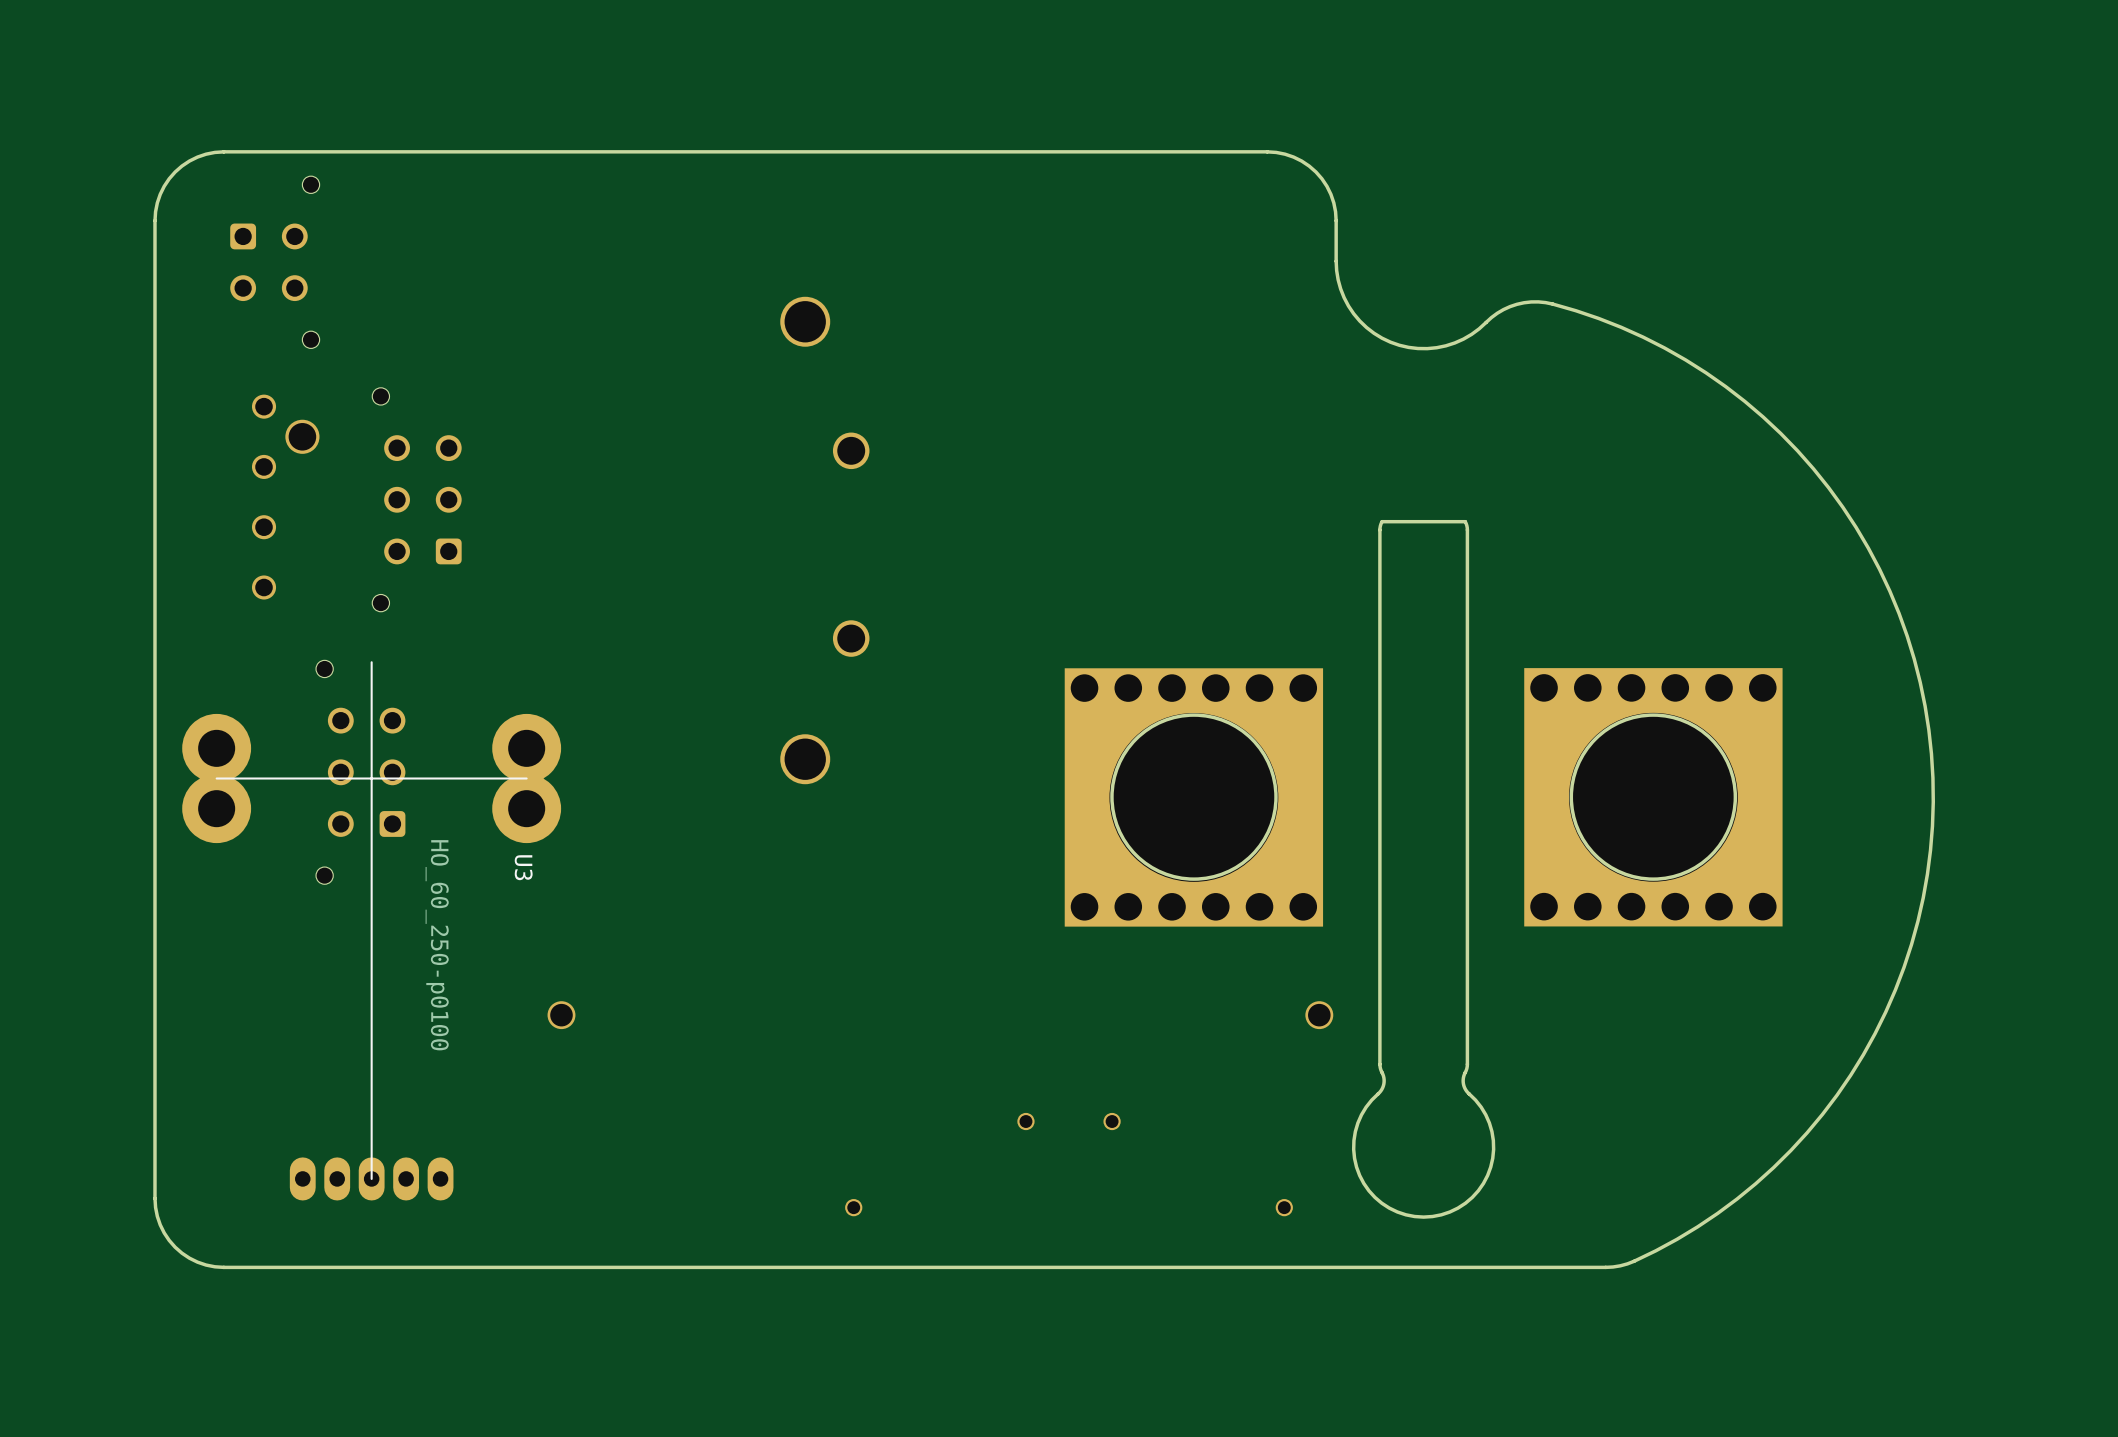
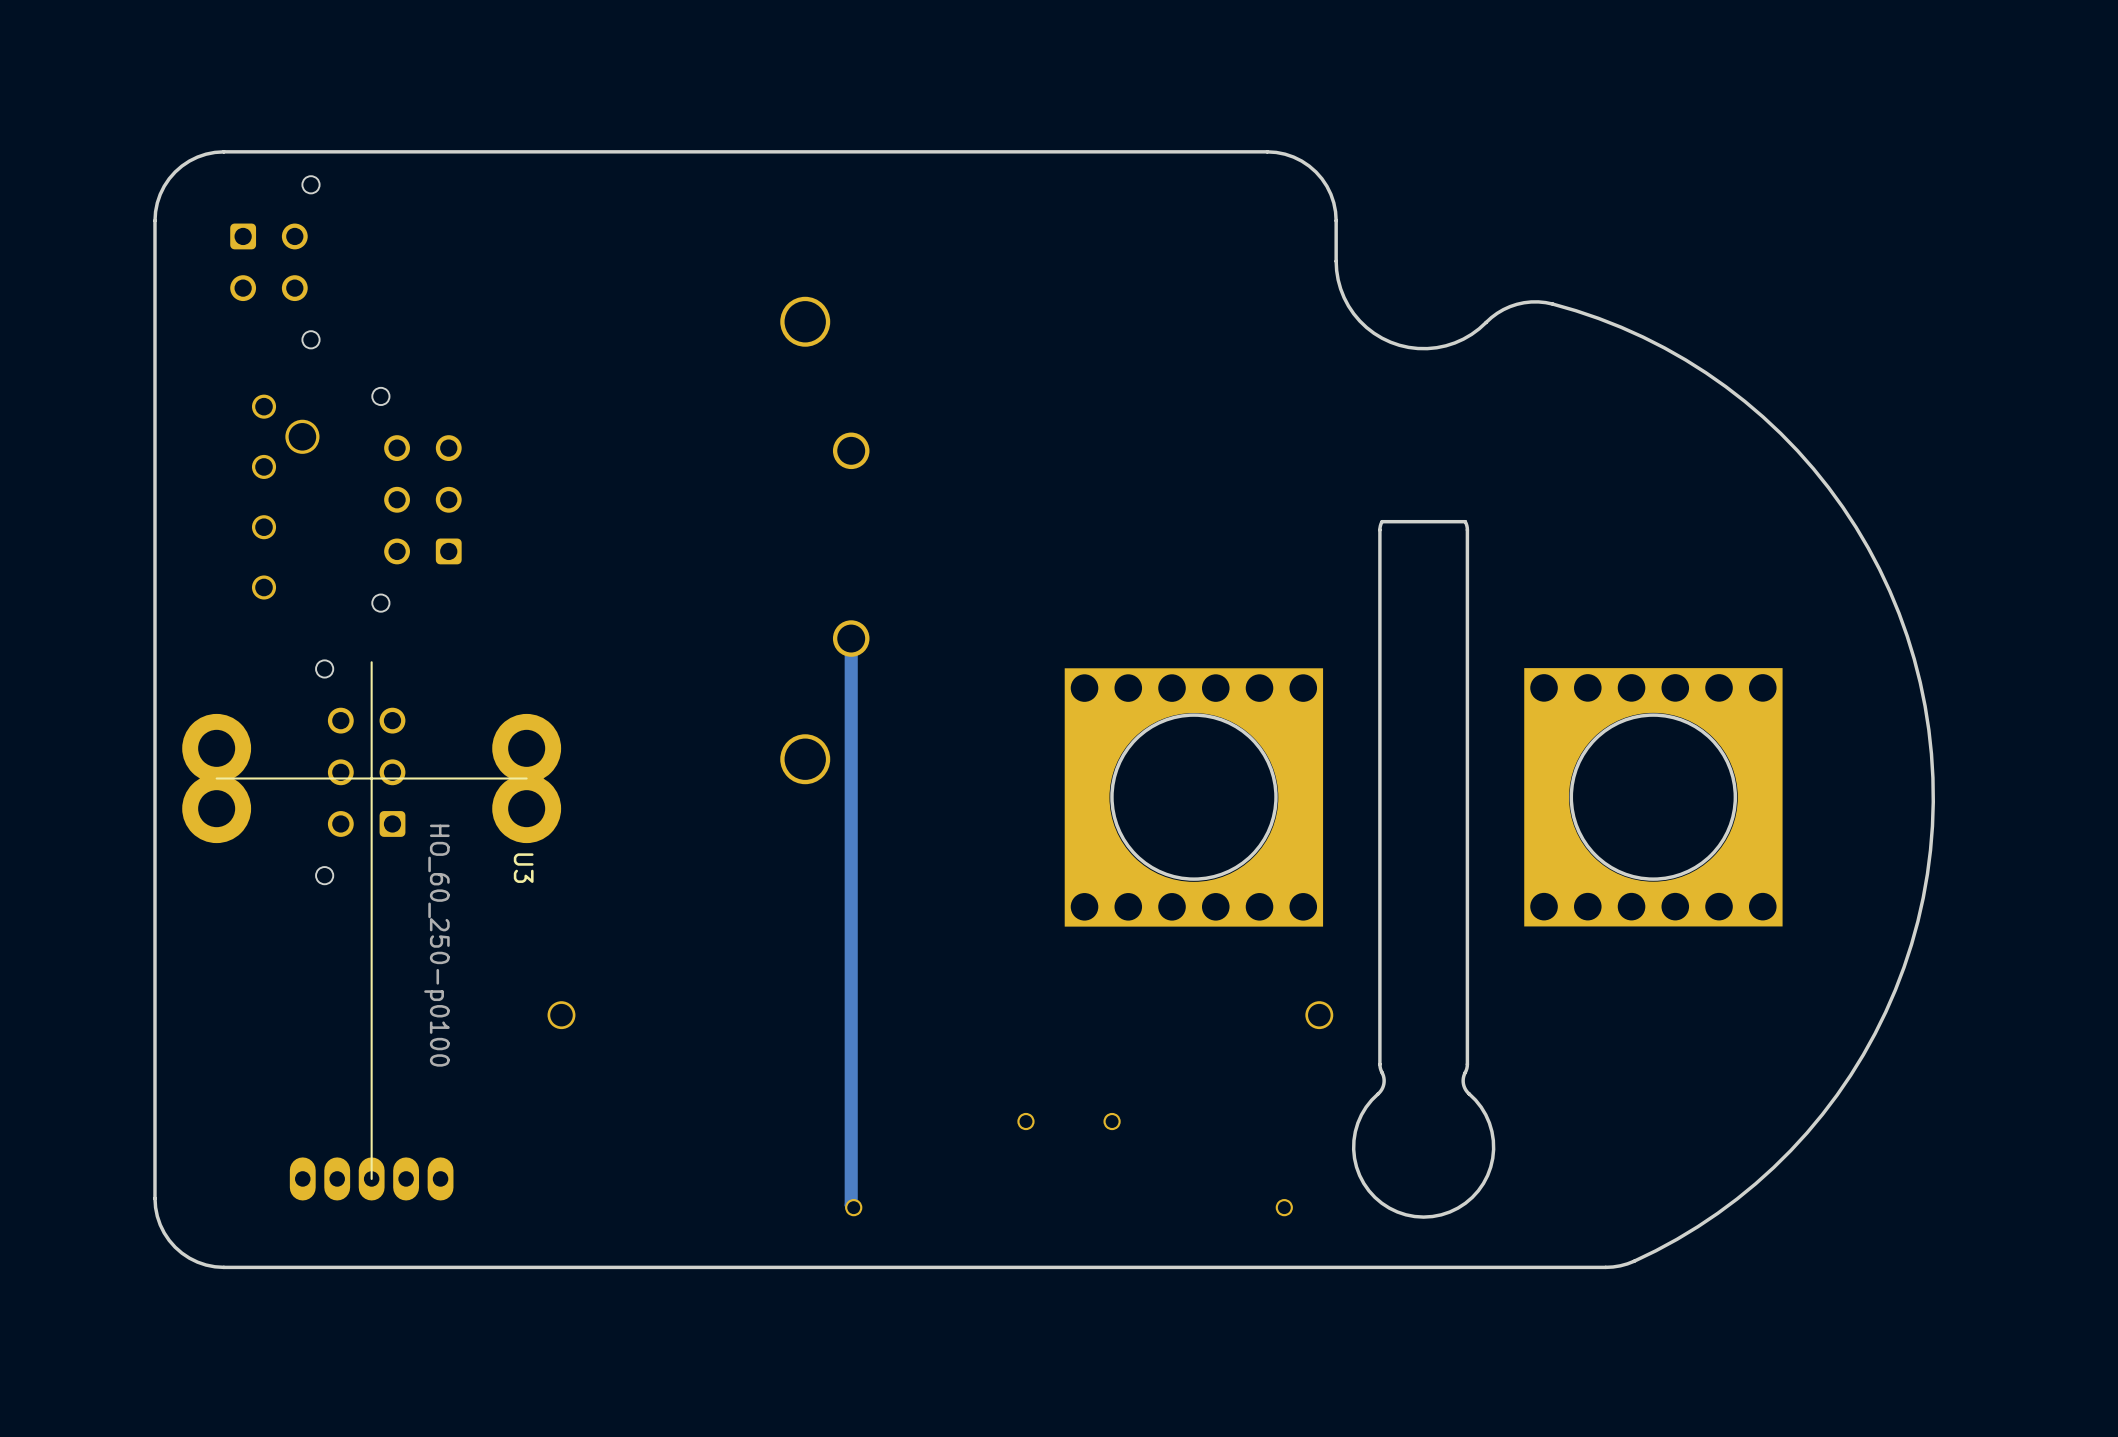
track: none -> (851, 638) (851, 1205) (853, 1207)

